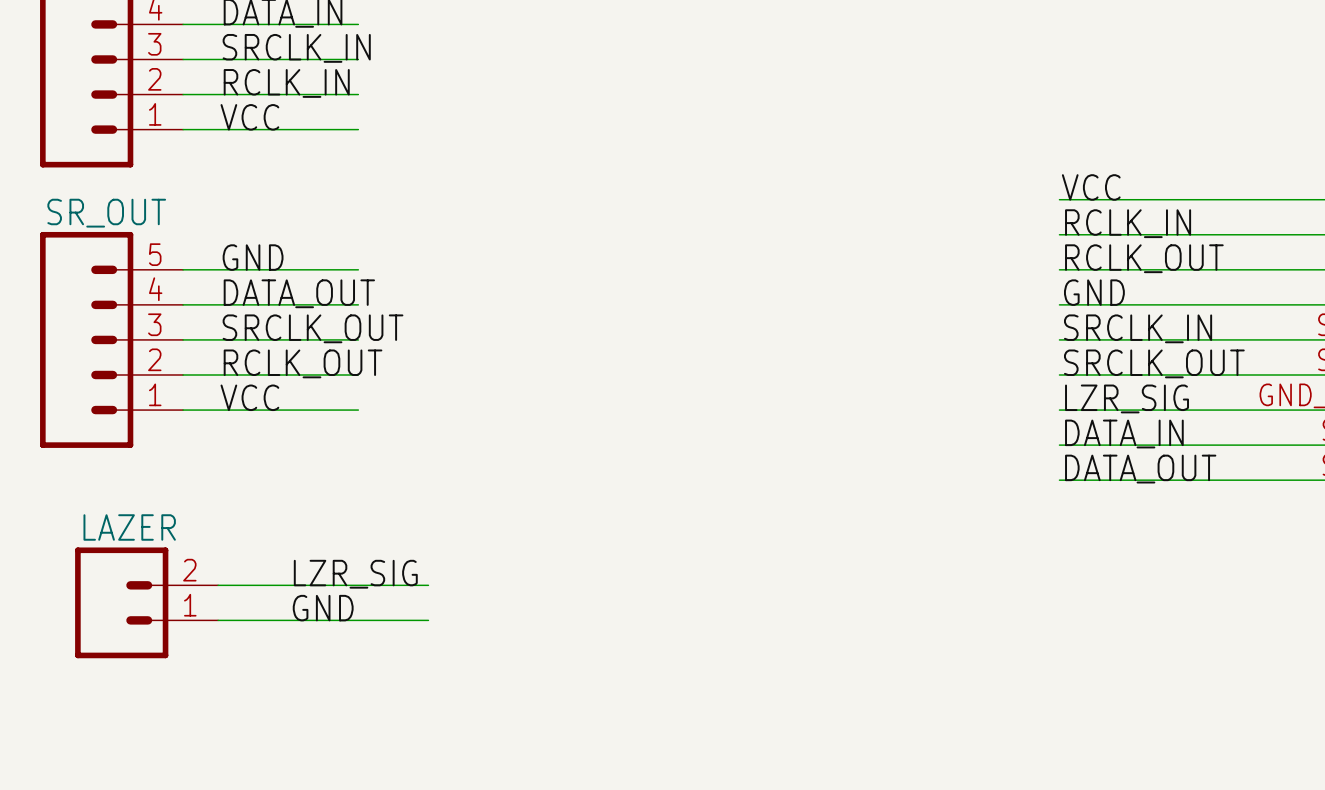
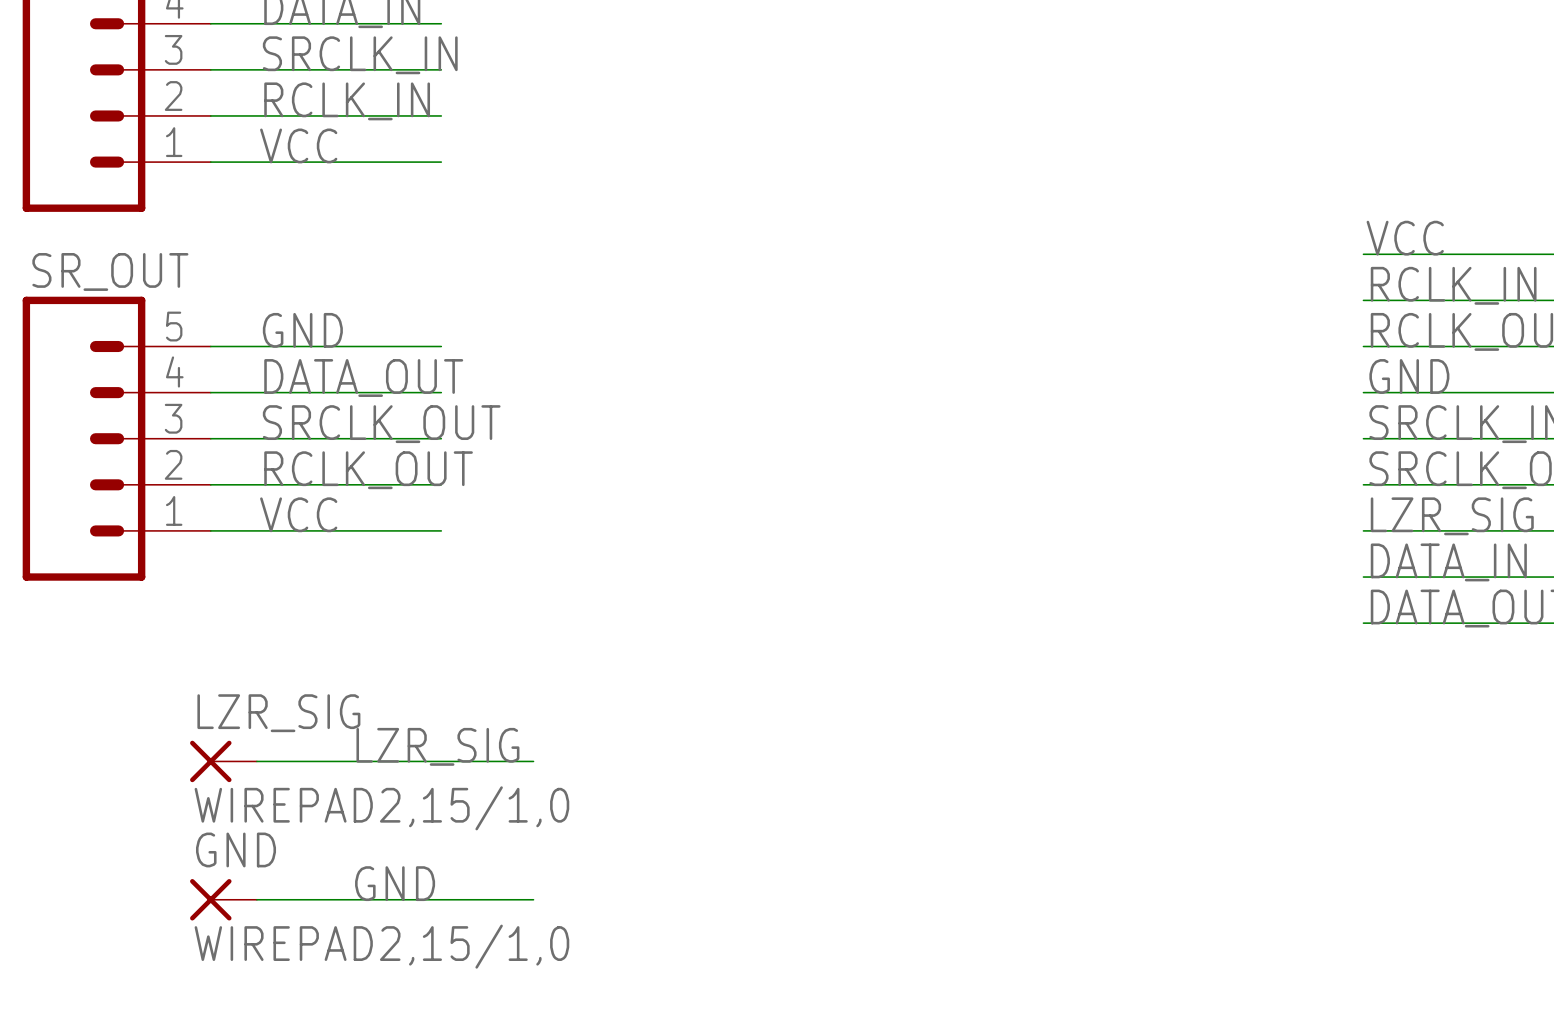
LZR_SIG: none -> WIREPAD2,15/1,0 (223, 761)
LAZER: (146, 602) -> none
label position: GND (323, 608) -> GND (395, 883)
wire: (218, 620) (428, 620) -> (256, 899) (533, 899)
GND: none -> WIREPAD2,15/1,0 (223, 899)

